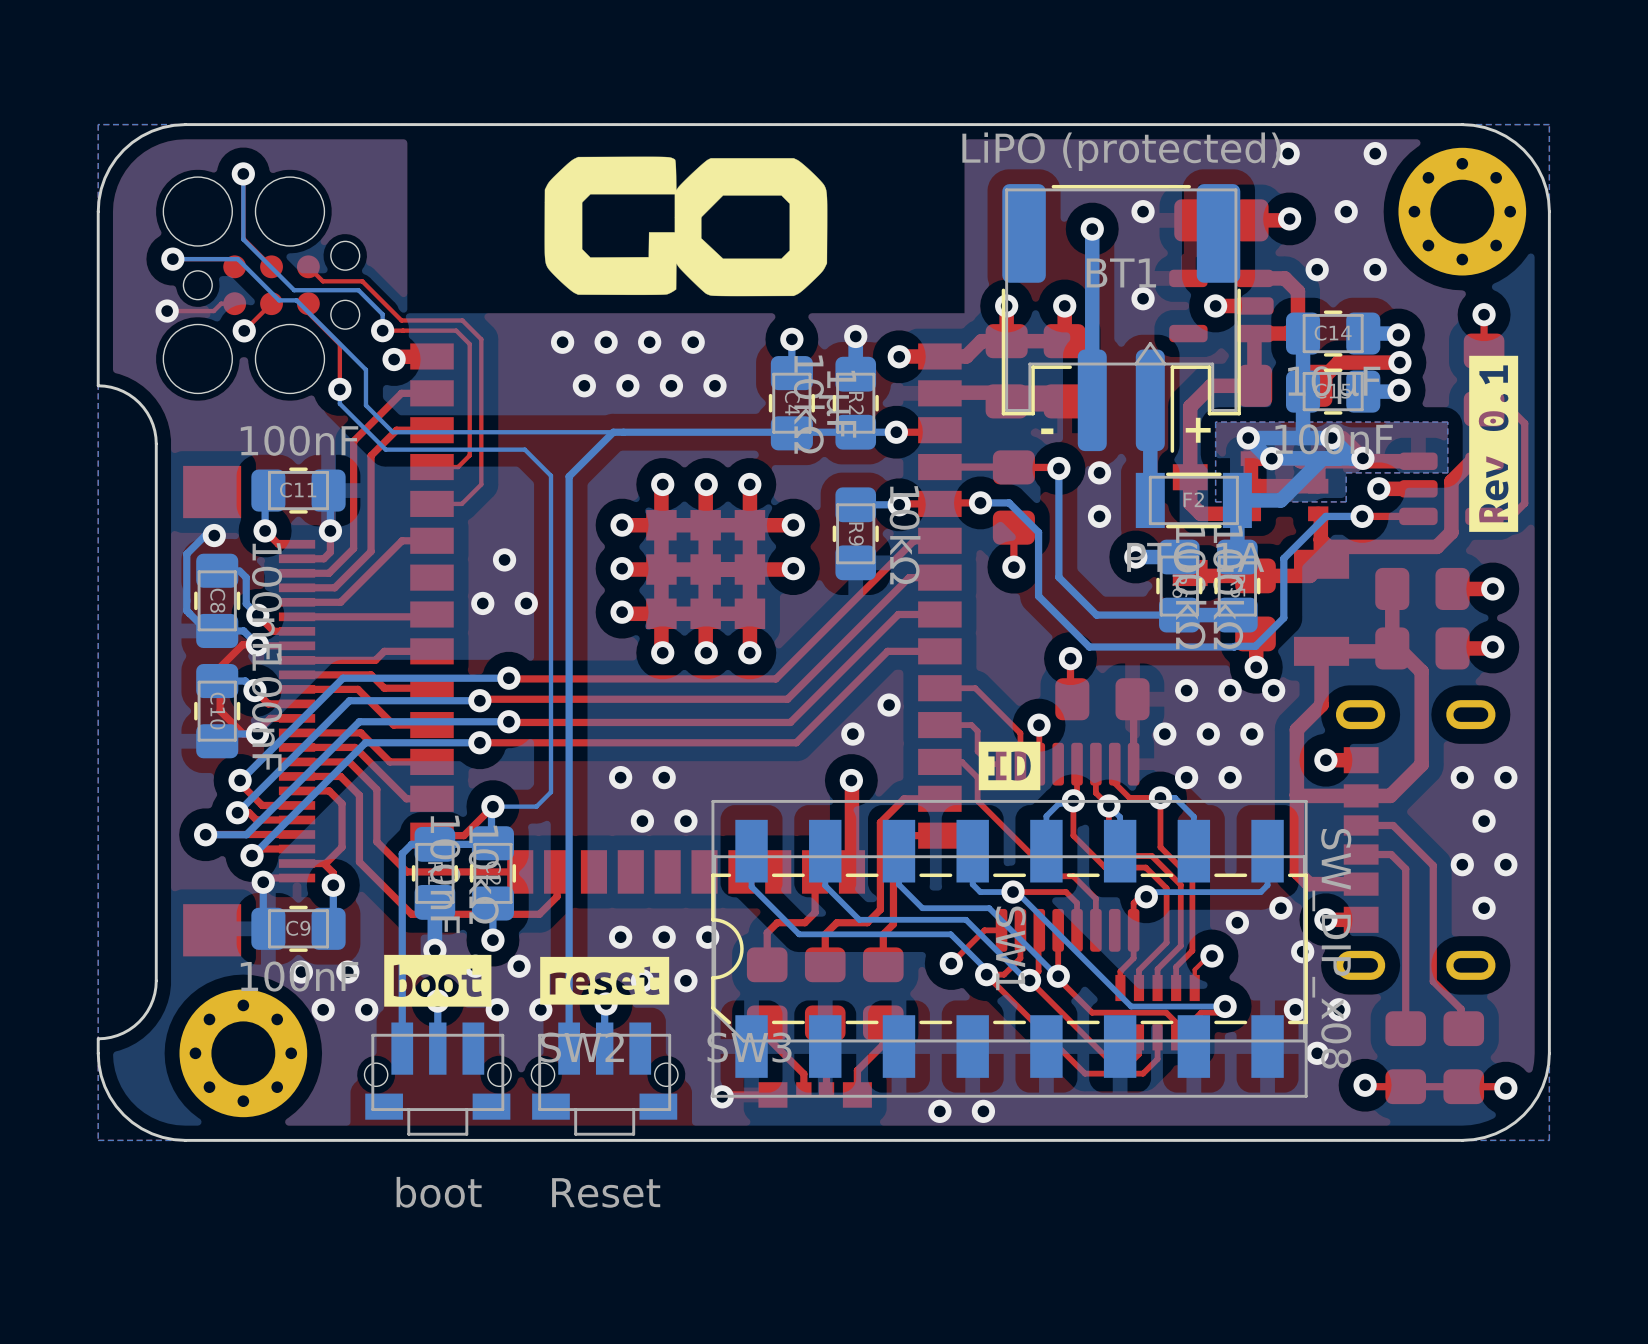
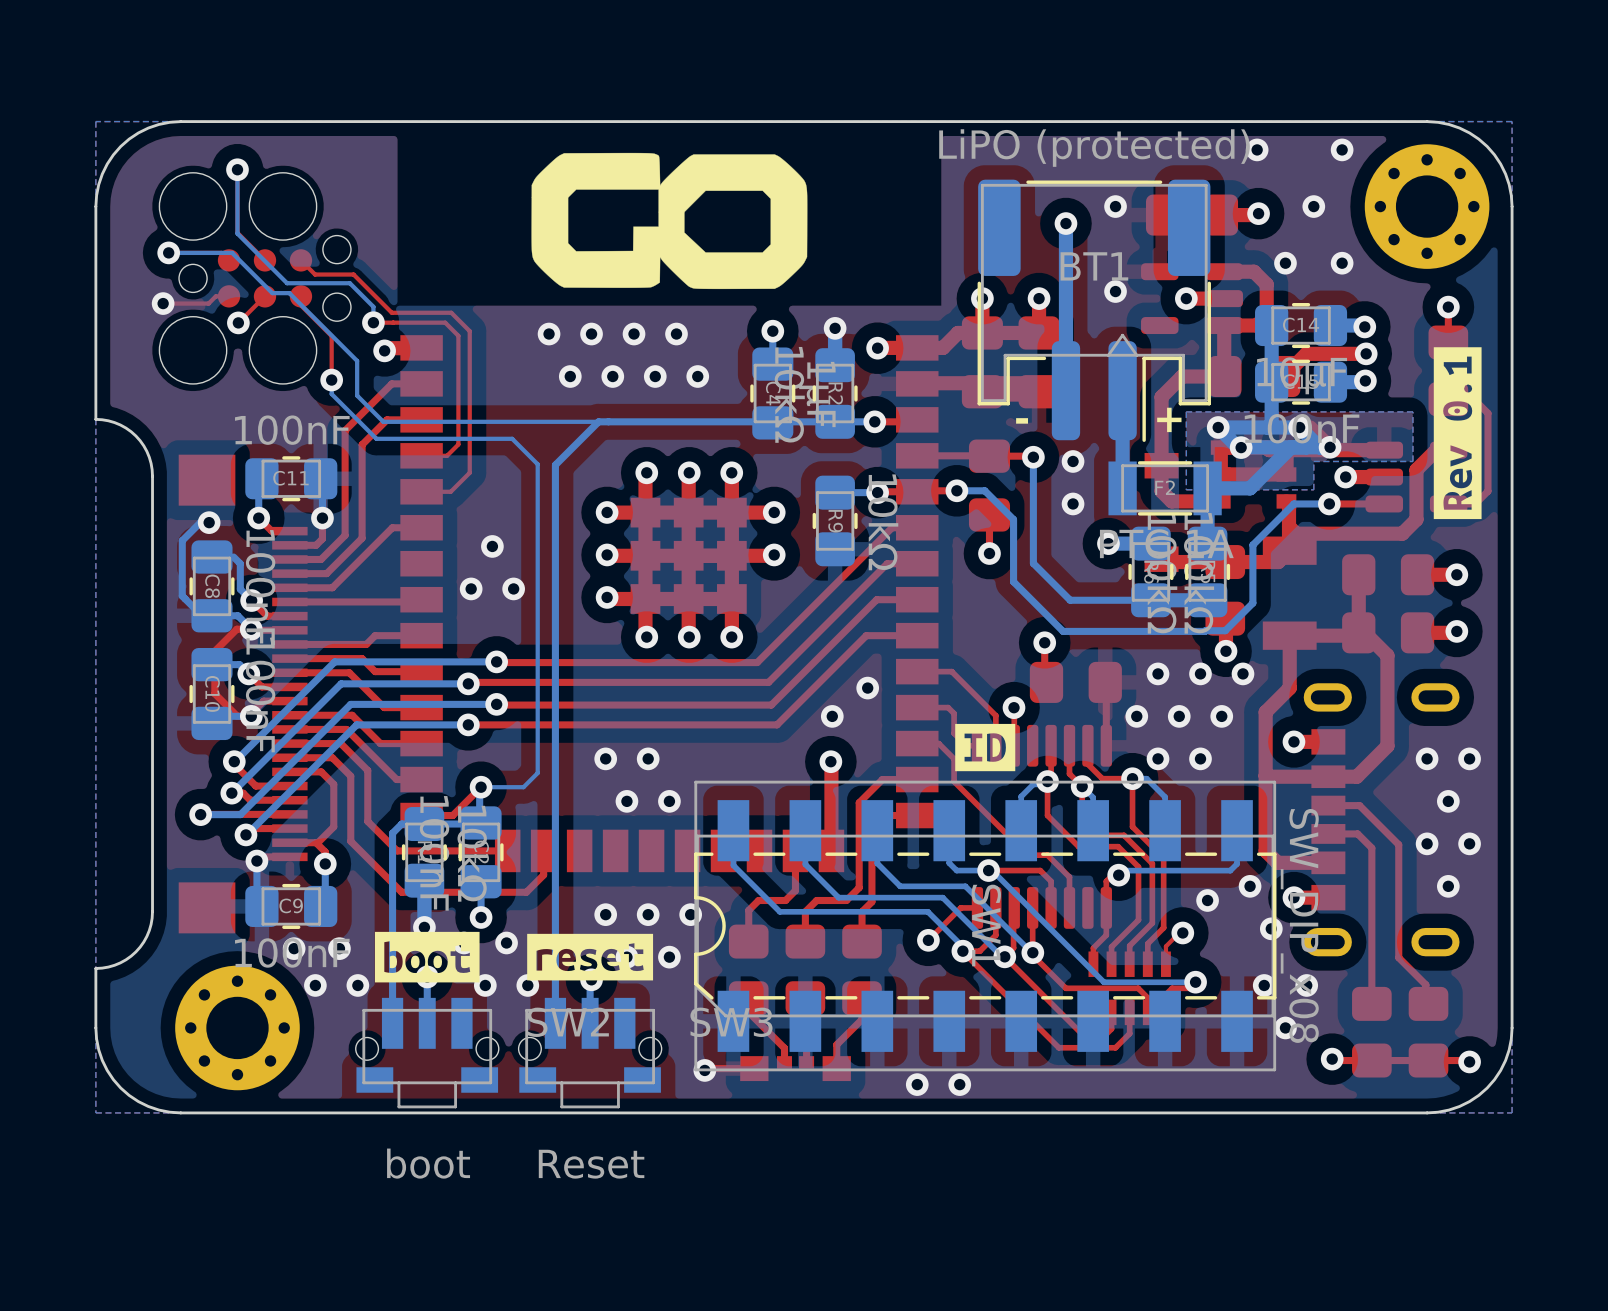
board edge: (98, 385) (117, 389) (129, 394) (147, 412) (155, 437) (156, 487) -> (95, 376) (95, 419) (114, 422) (135, 435) (149, 457) (152, 476)
board edge: (156, 934) (155, 987) (147, 1011) (134, 1026) (123, 1033) (98, 1038) -> (152, 911) (146, 936) (135, 951) (120, 962) (95, 968) (95, 1013)

